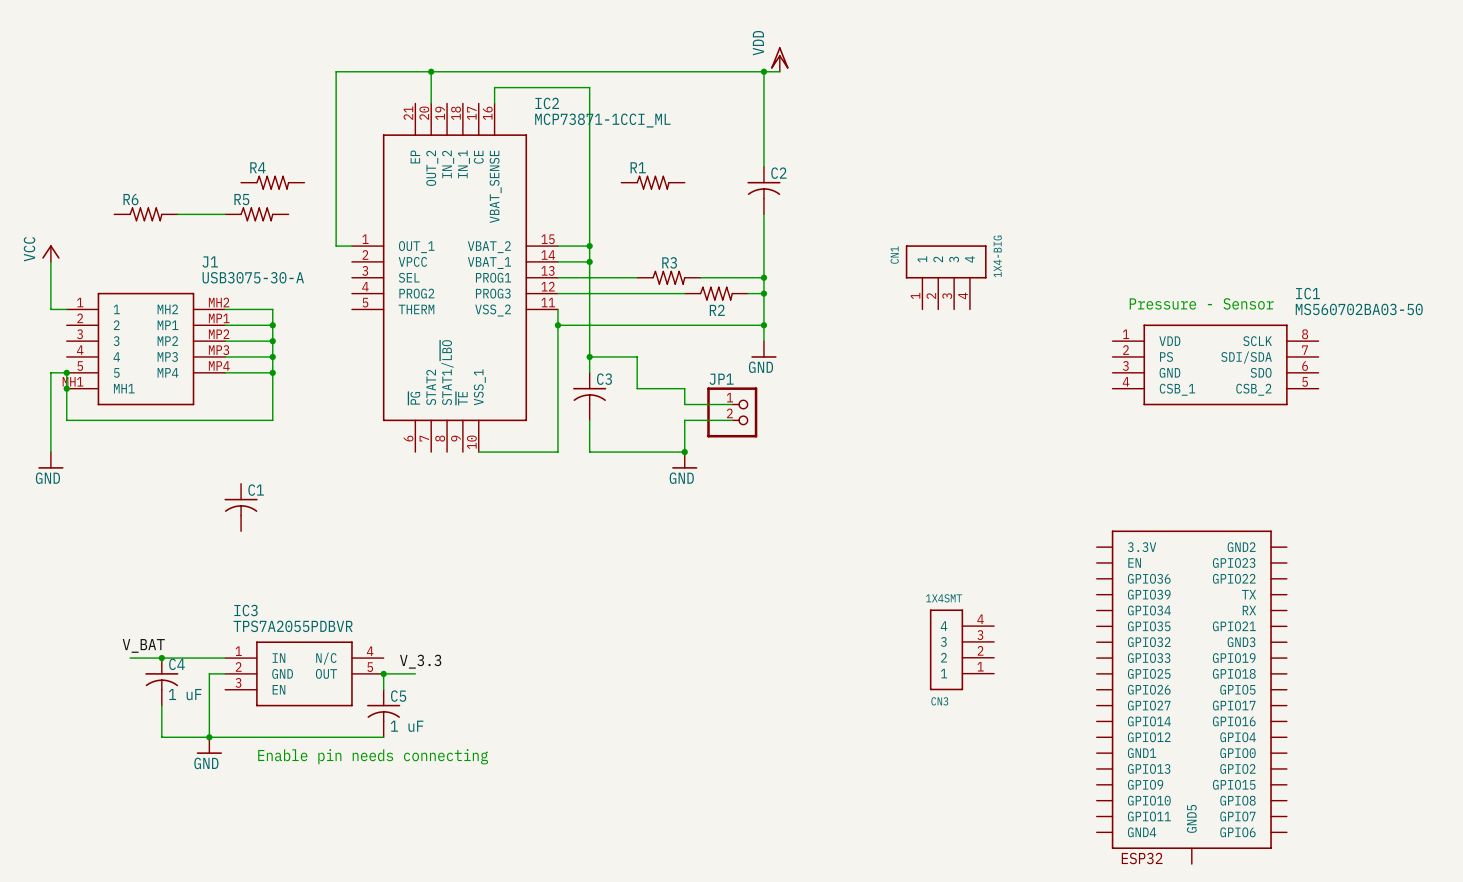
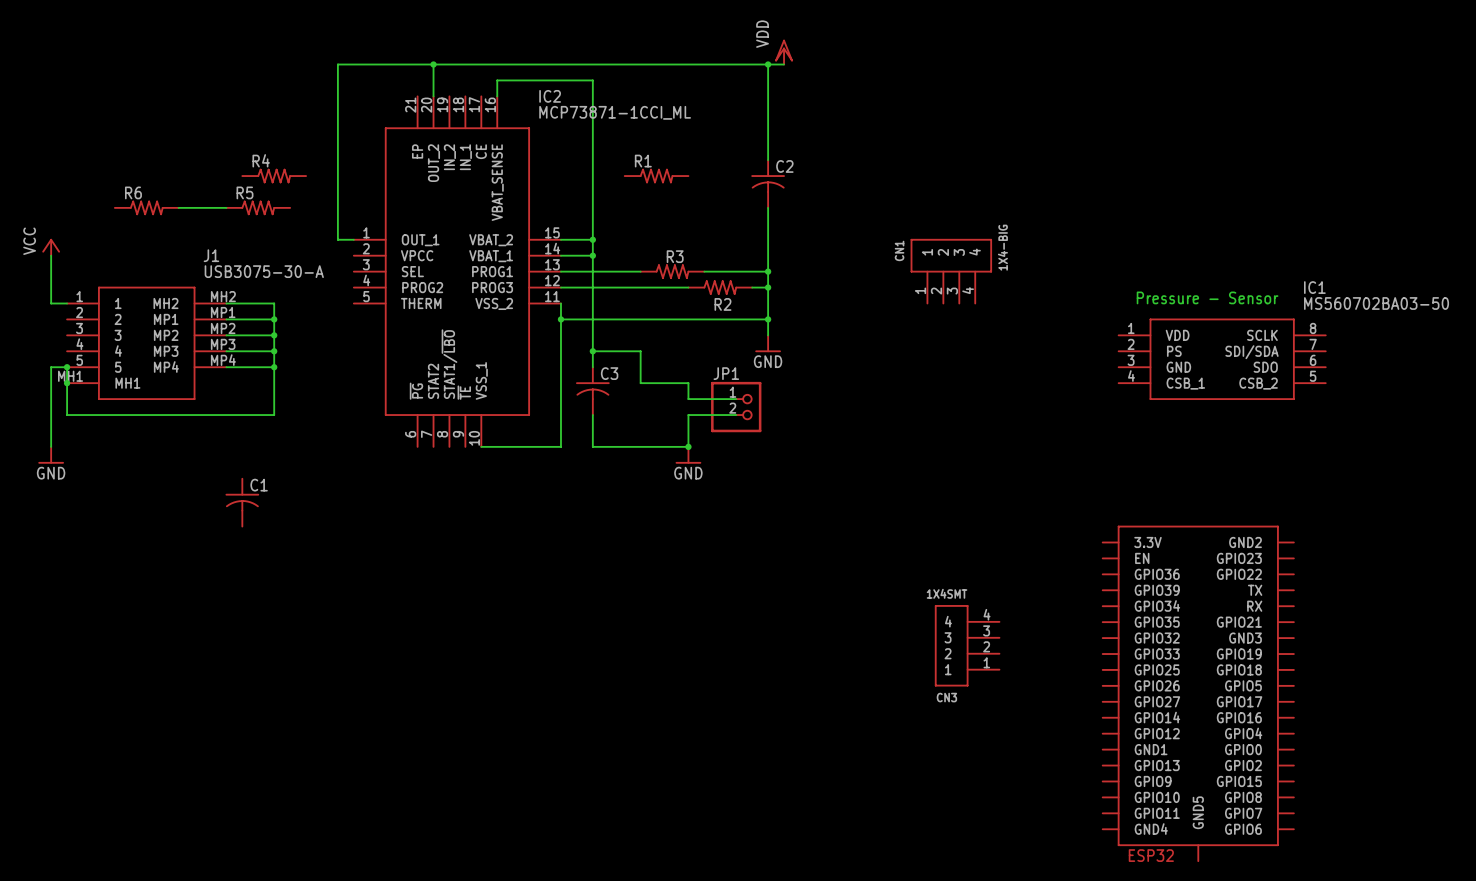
label: V_BAT (143, 645) -> none
wire: (130, 658) (225, 658) -> none
junction: (161, 658) -> none
label: V_3.3 (420, 661) -> none
wire: (225, 673) (209, 673) (209, 737) -> none
IC3: TPS7A2055PDBVR (304, 673) -> none
junction: (383, 673) -> none
wire: (415, 673) (383, 673) (383, 689) -> none
C4: 1 uF (161, 681) -> none
wire: (161, 705) (161, 737) (383, 737) -> none
C5: 1 uF (383, 713) -> none
junction: (209, 737) -> none
power symbol: GND (209, 745) -> none
text: Enable pin needs connecting (373, 756) -> none

